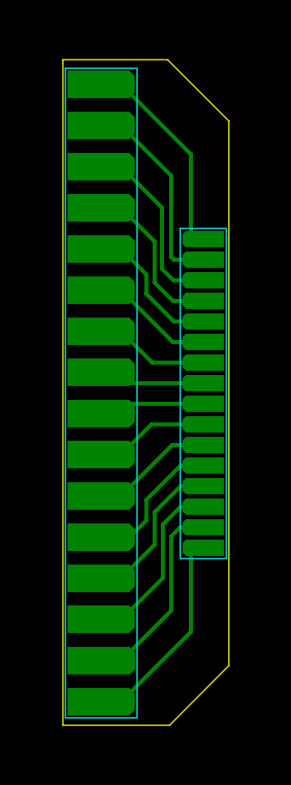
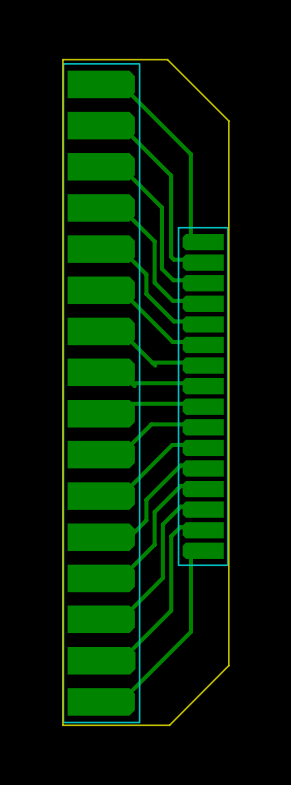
part footprint: [64, 67, 138, 719] -> [62, 63, 141, 724]
part footprint: [179, 227, 228, 560] -> [177, 226, 229, 567]

